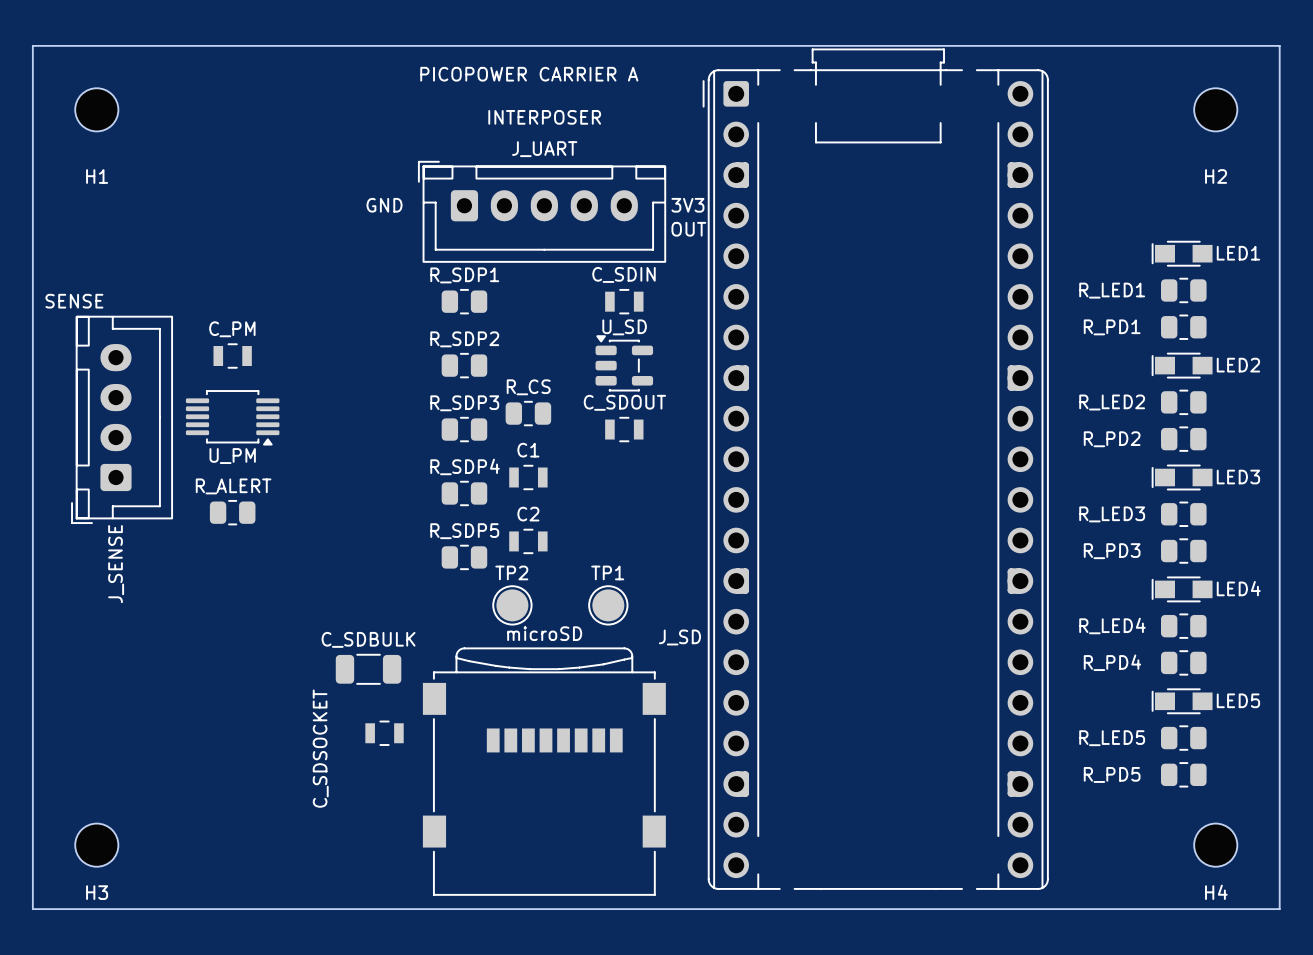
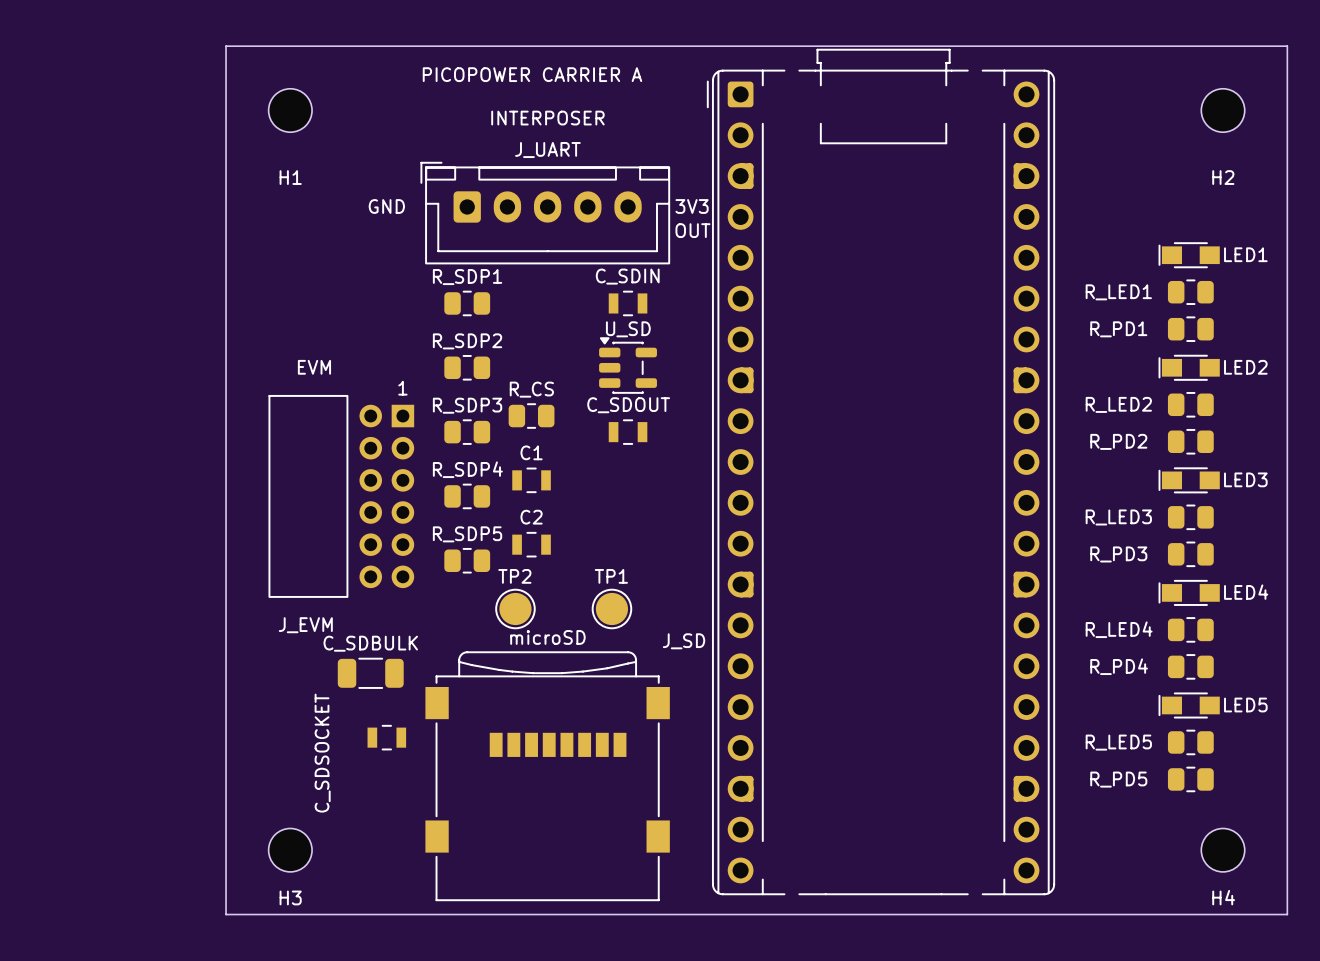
board edge: (224, 45) (32, 45) (32, 909) (224, 909) -> (226, 46) (226, 914)
H1 position: (96, 109) -> (290, 110)
text: SENSE (74, 301) -> none
C_PM: (232, 356) -> none
text: none -> EVM (314, 367)
U_PM: (232, 417) -> none
J_SENSE: (122, 419) -> none
J_EVM: none -> (341, 496)
R_ALERT: (232, 512) -> none
H3 position: (96, 845) -> (290, 850)

